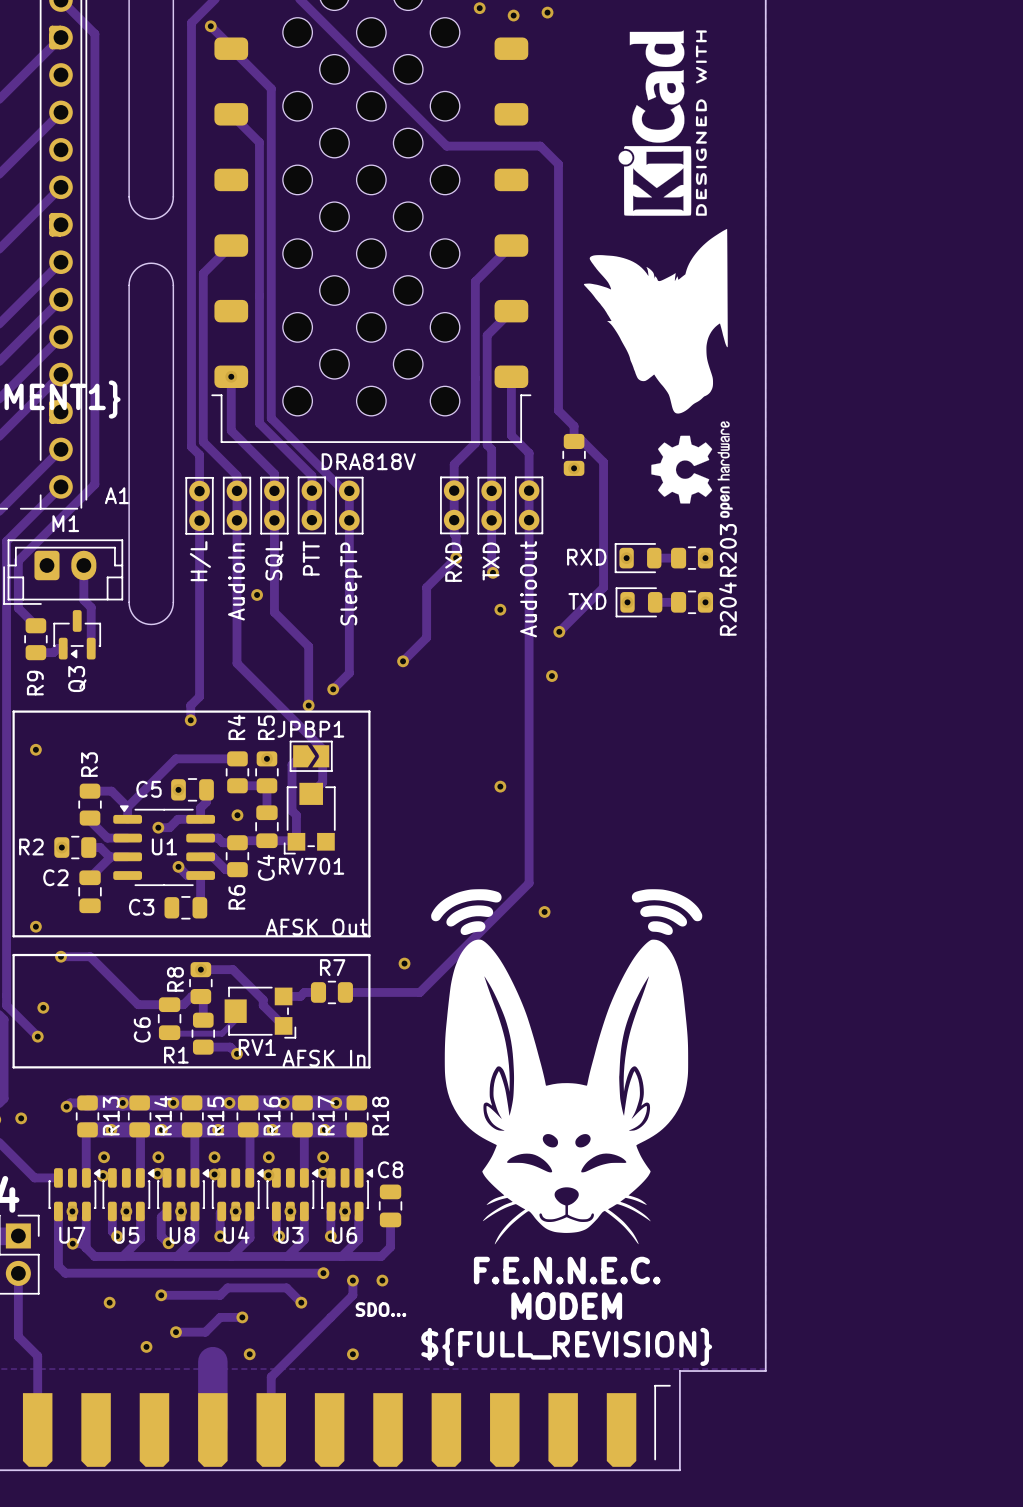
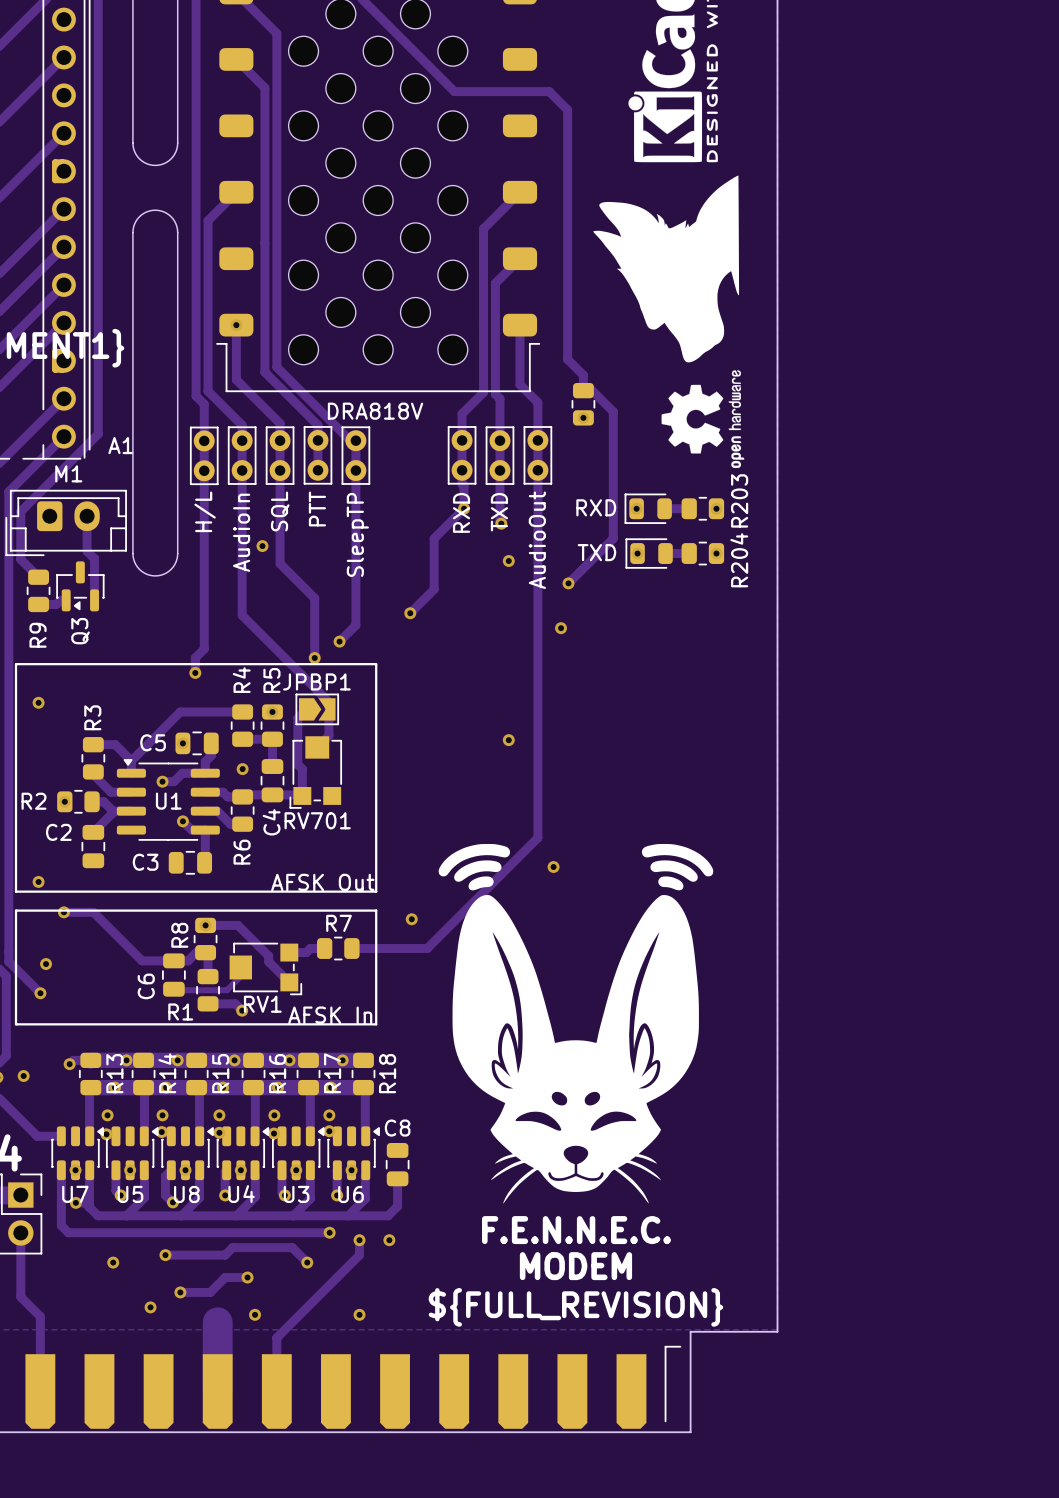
text: SDO... (380, 1309) -> none

